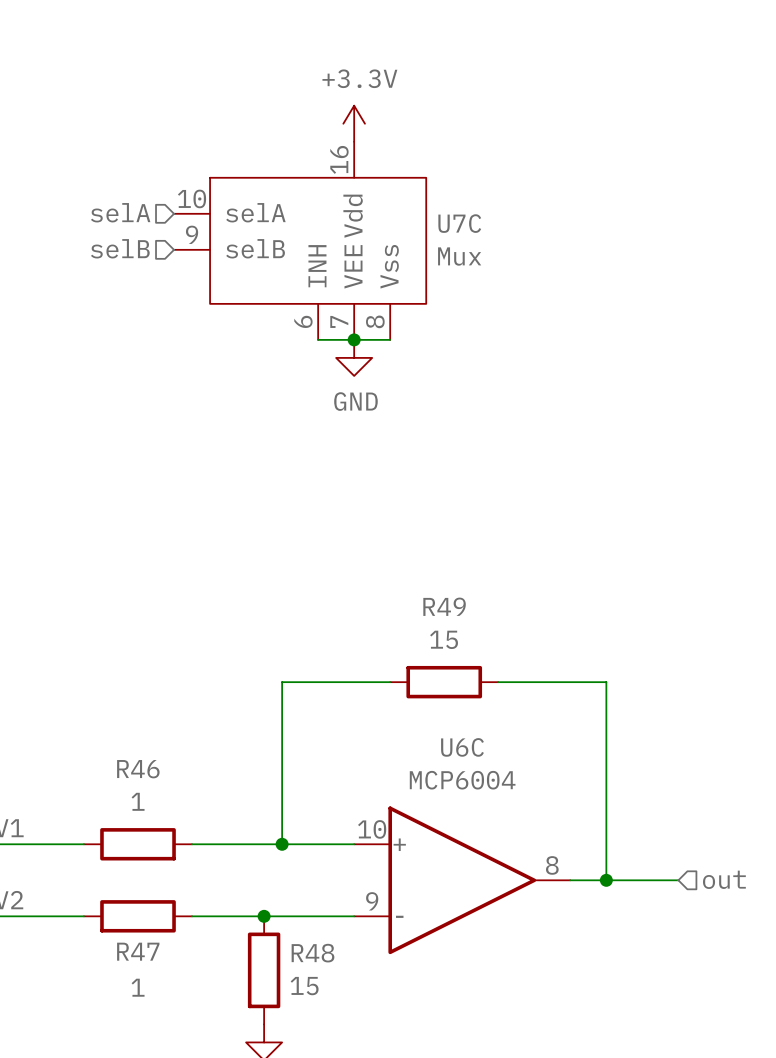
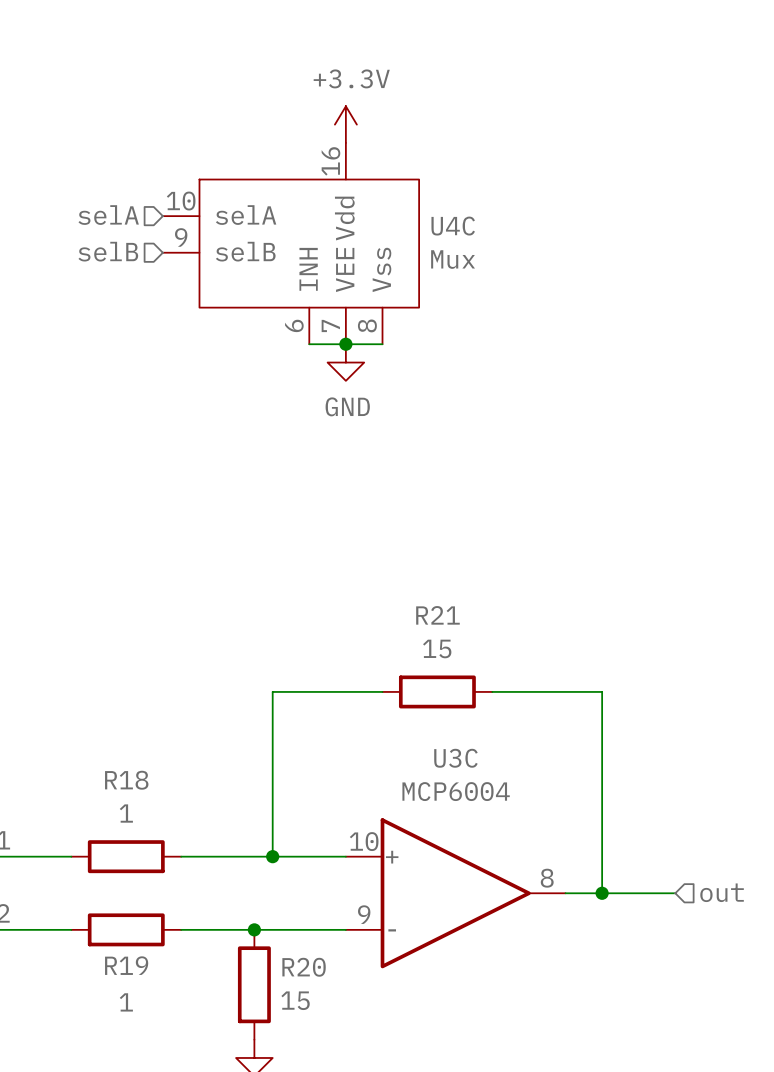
U7C name: U7C (459, 223) -> U4C (453, 226)
R49 name: R49 (444, 606) -> R21 (437, 615)
U6C name: U6C (462, 747) -> U3C (455, 758)
R46 name: R46 (138, 769) -> R18 (126, 780)
R47 name: R47 (138, 951) -> R19 (126, 965)
R48 name: R48 (312, 953) -> R20 (304, 967)

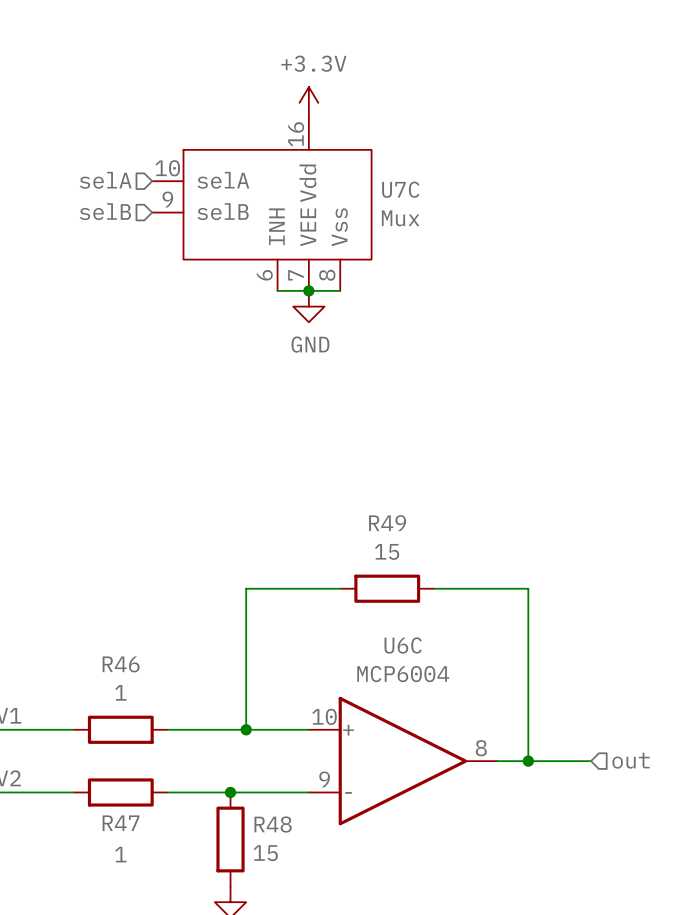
U4C name: U4C (453, 226) -> U7C (400, 189)
R21 name: R21 (437, 615) -> R49 (387, 523)
U3C name: U3C (455, 758) -> U6C (403, 645)
R18 name: R18 (126, 780) -> R46 (121, 664)
R19 name: R19 (126, 965) -> R47 (121, 823)
R20 name: R20 (304, 967) -> R48 (273, 824)

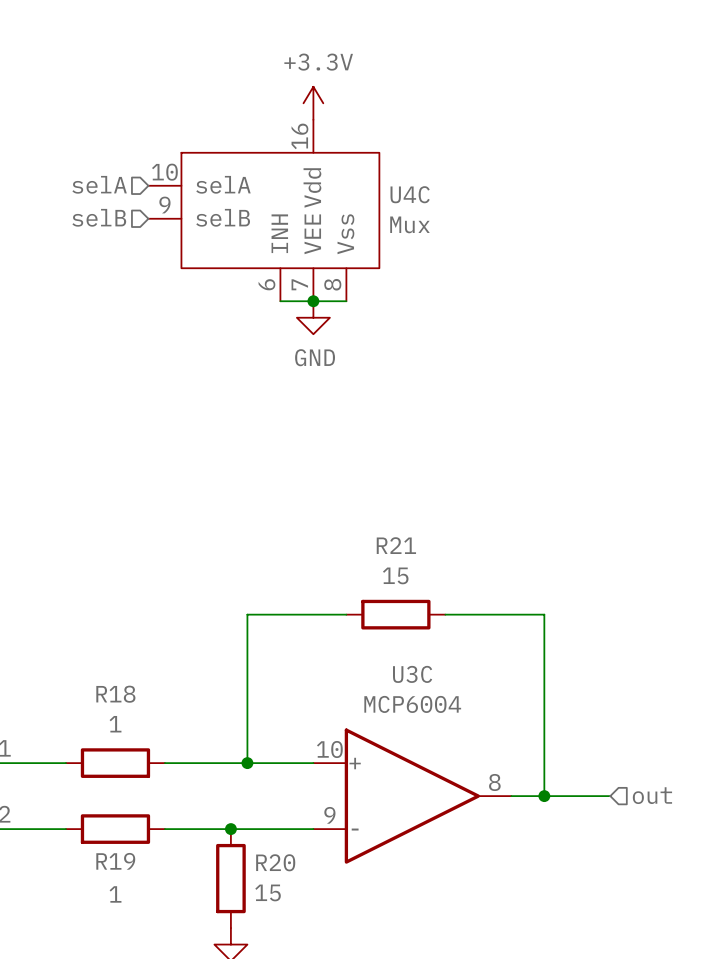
U7C name: U7C (400, 189) -> U4C (410, 194)
R49 name: R49 (387, 523) -> R21 (396, 545)
U6C name: U6C (403, 645) -> U3C (412, 674)
R46 name: R46 (121, 664) -> R18 (115, 694)
R47 name: R47 (121, 823) -> R19 (115, 861)
R48 name: R48 (273, 824) -> R20 (275, 862)

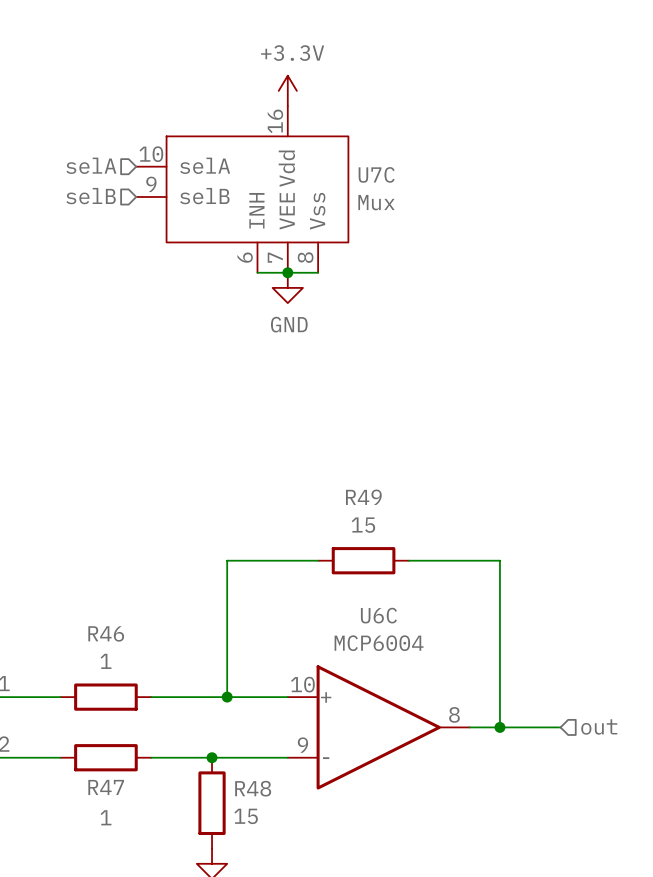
U4C name: U4C (410, 194) -> U7C (376, 174)
R21 name: R21 (396, 545) -> R49 (363, 497)
U3C name: U3C (412, 674) -> U6C (378, 615)
R18 name: R18 (115, 694) -> R46 (106, 633)
R19 name: R19 (115, 861) -> R47 (106, 787)
R20 name: R20 (275, 862) -> R48 (253, 788)

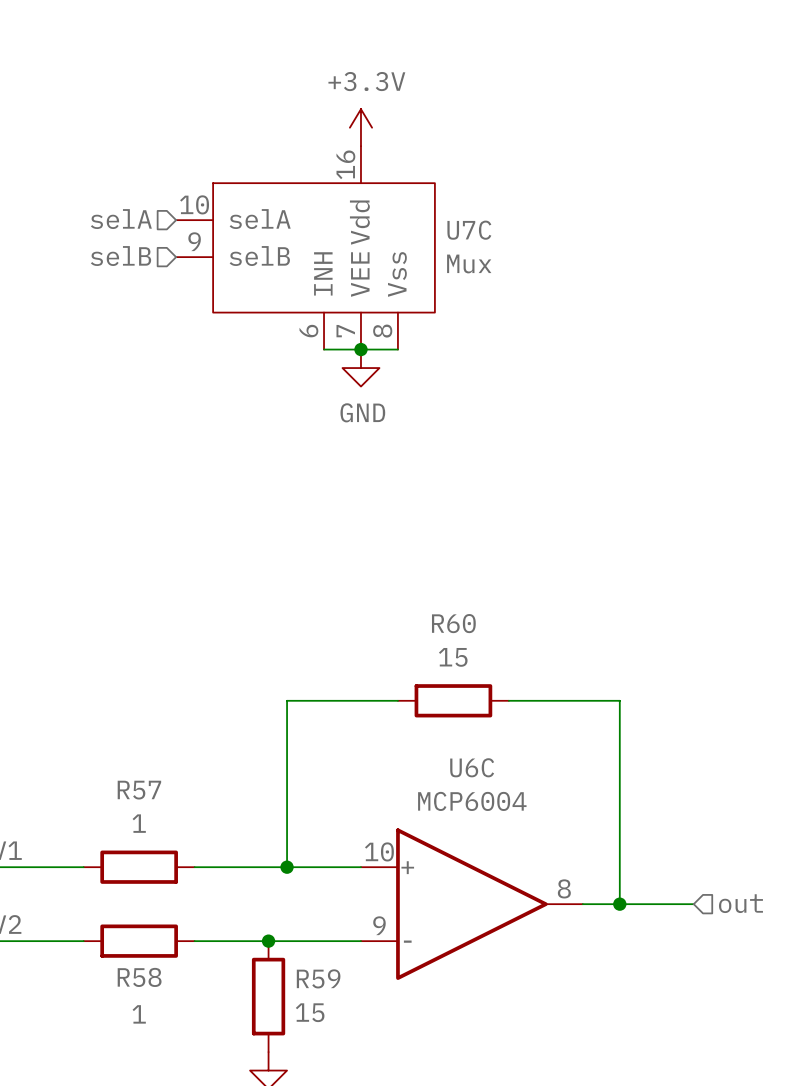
R49 name: R49 (363, 497) -> R60 (453, 623)
R46 name: R46 (106, 633) -> R57 (139, 790)
R47 name: R47 (106, 787) -> R58 (139, 977)
R48 name: R48 (253, 788) -> R59 (318, 978)

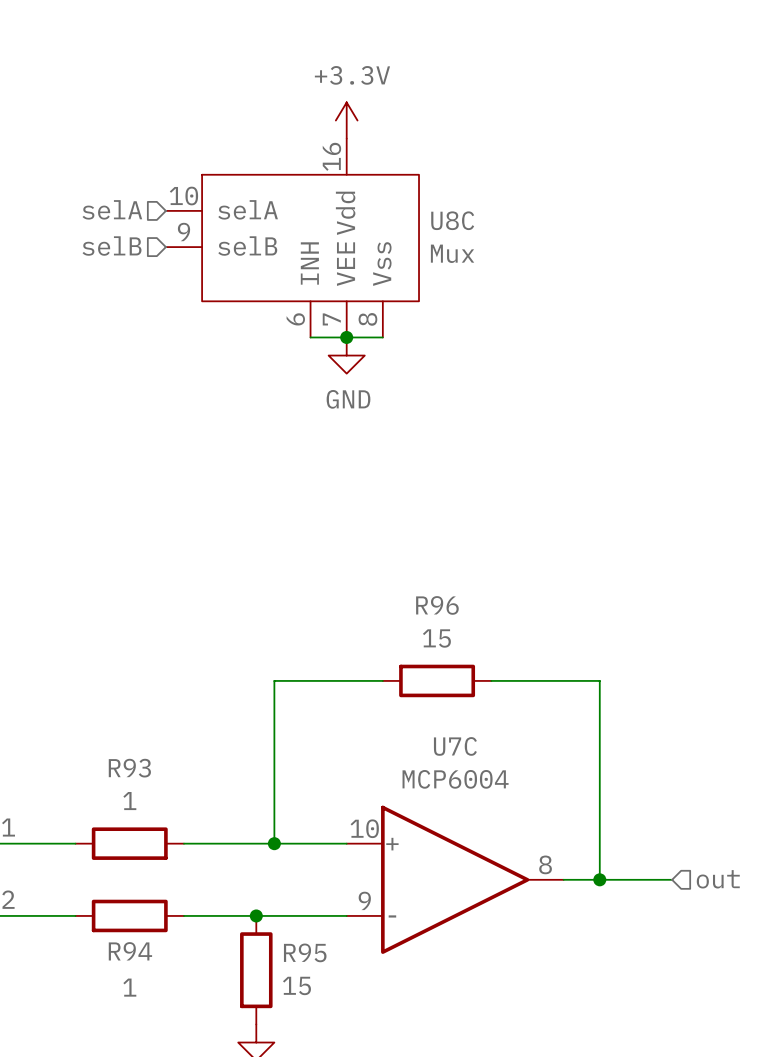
U7C name: U7C (469, 230) -> U8C (452, 220)
R60 name: R60 (453, 623) -> R96 (437, 605)
U6C name: U6C (472, 767) -> U7C (455, 746)
R57 name: R57 (139, 790) -> R93 (129, 768)
R58 name: R58 (139, 977) -> R94 (130, 951)
R59 name: R59 (318, 978) -> R95 (305, 952)

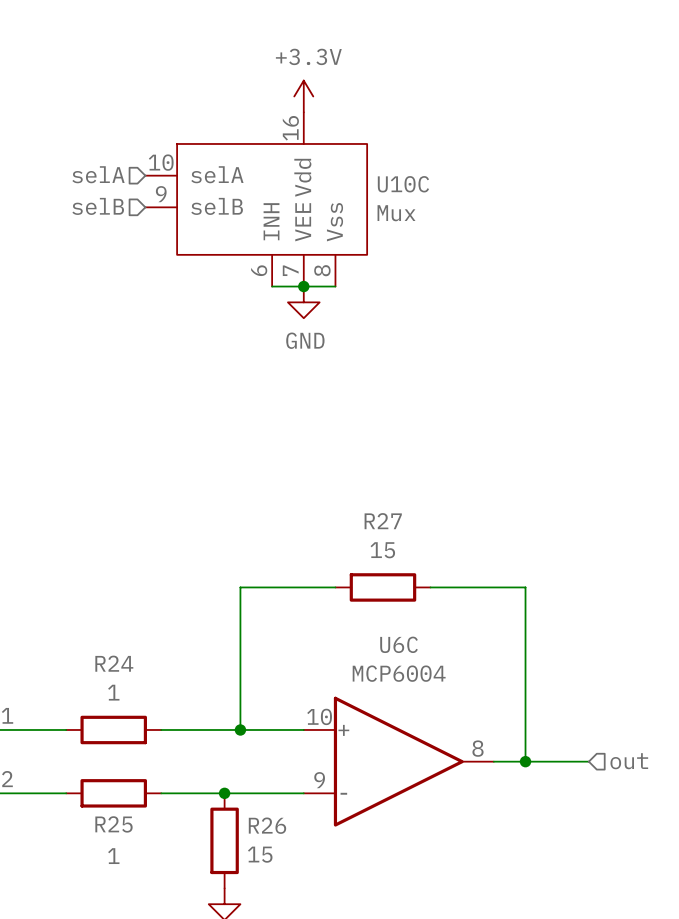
U8C name: U8C (452, 220) -> U10C (403, 184)
R96 name: R96 (437, 605) -> R27 (383, 521)
U7C name: U7C (455, 746) -> U6C (399, 644)
R93 name: R93 (129, 768) -> R24 (114, 663)
R94 name: R94 (130, 951) -> R25 (113, 824)
R95 name: R95 (305, 952) -> R26 (267, 825)

